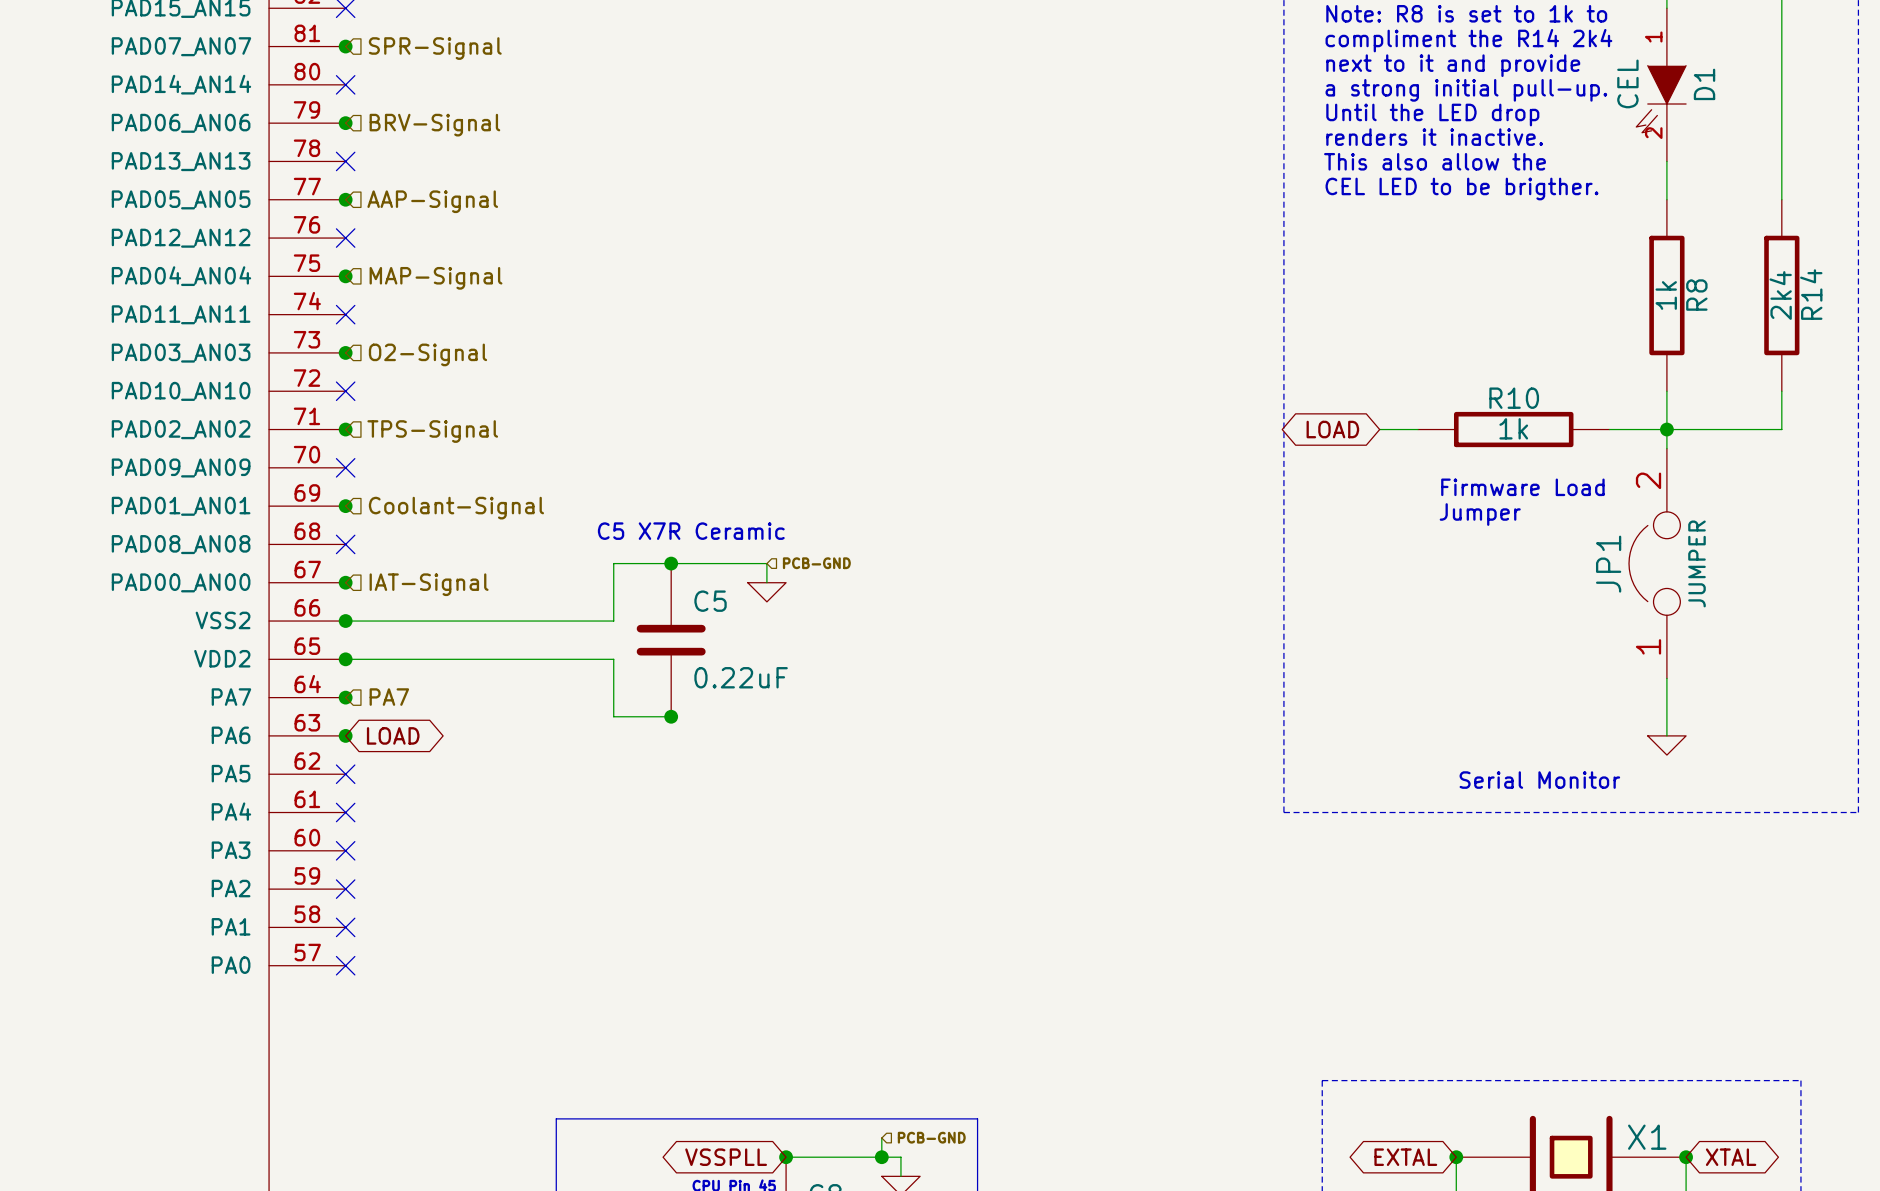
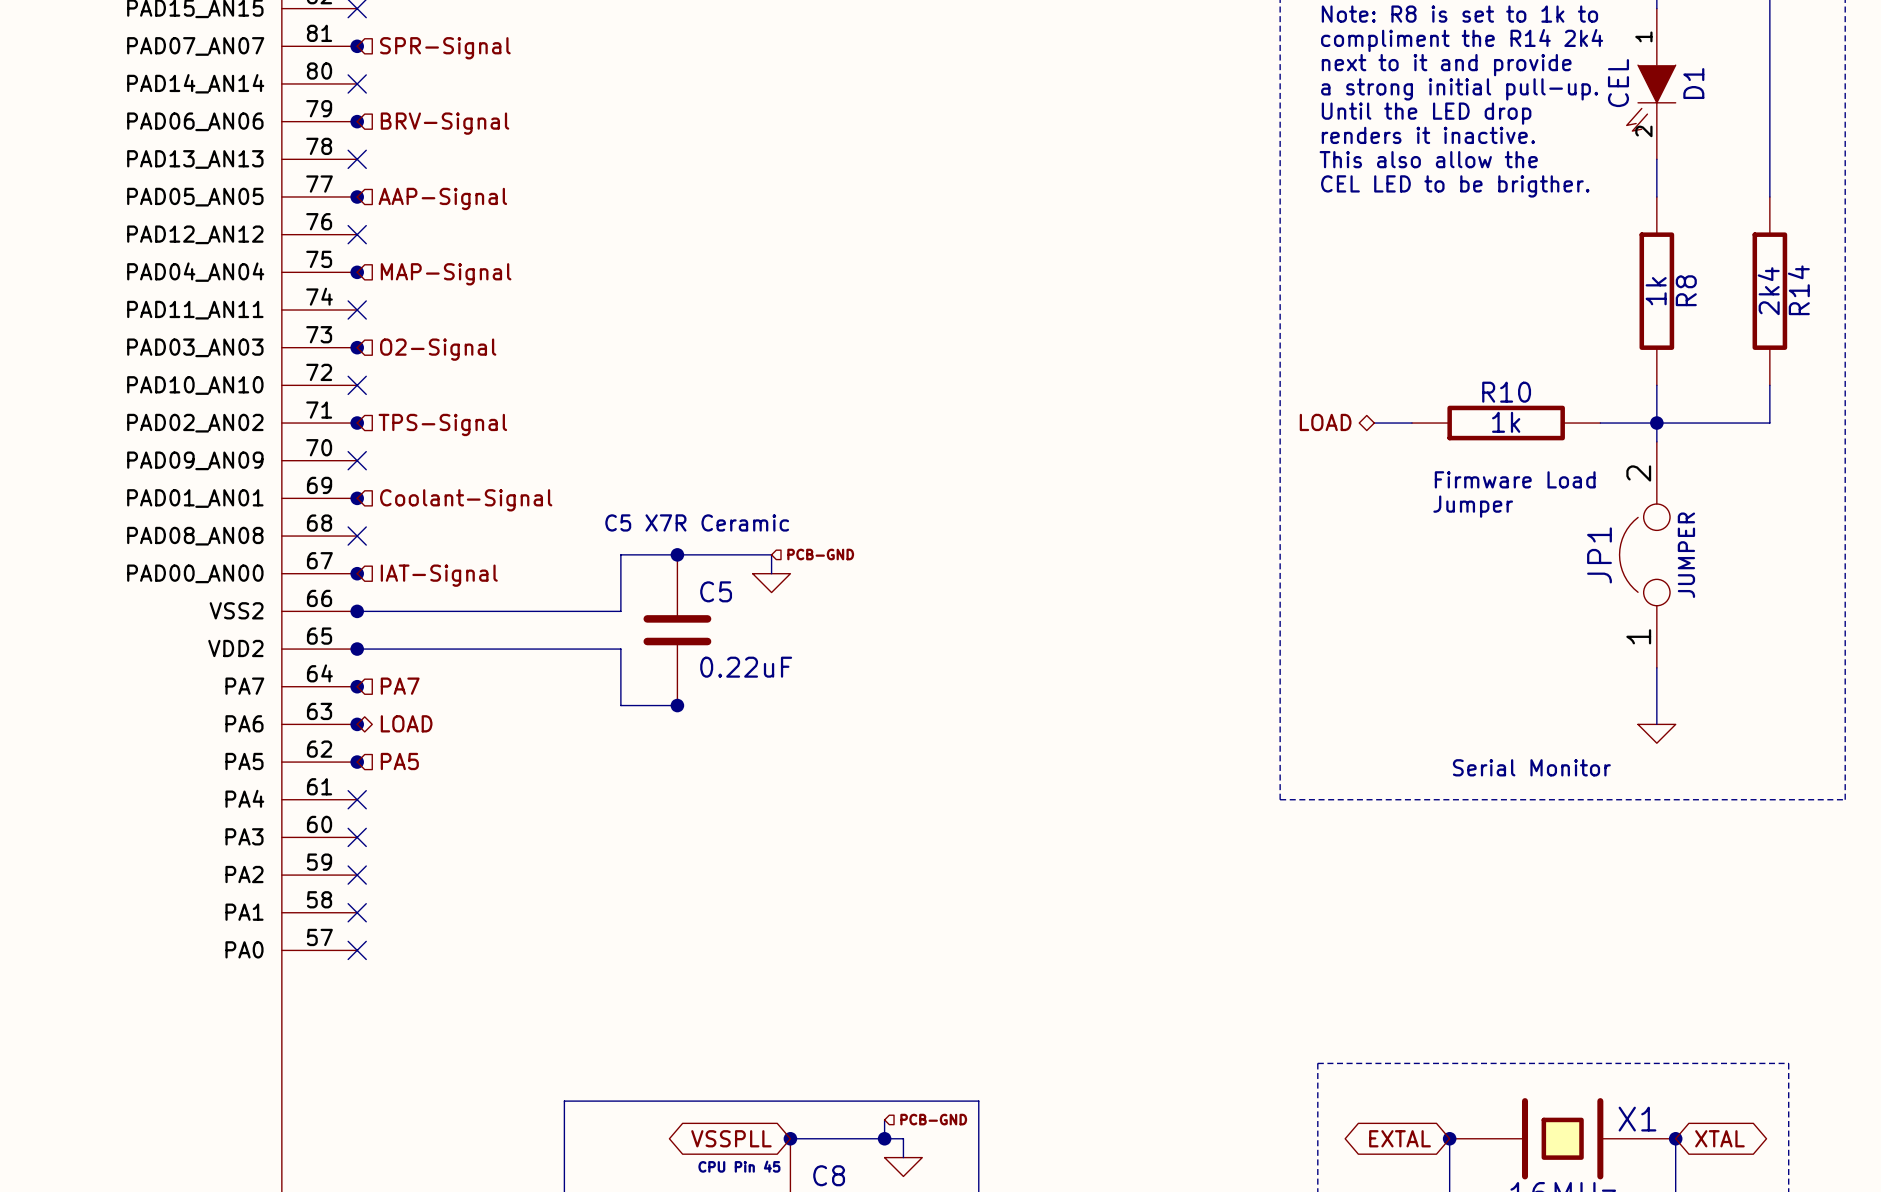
hierarchical label: none -> LOAD (1325, 422)
global label: LOAD (1332, 429) -> none
global label: LOAD (393, 735) -> none
hierarchical label: none -> LOAD (406, 723)
hierarchical label: none -> PA5 (399, 761)
no-connect mark: (345, 774) -> none
junction: none -> (357, 762)

